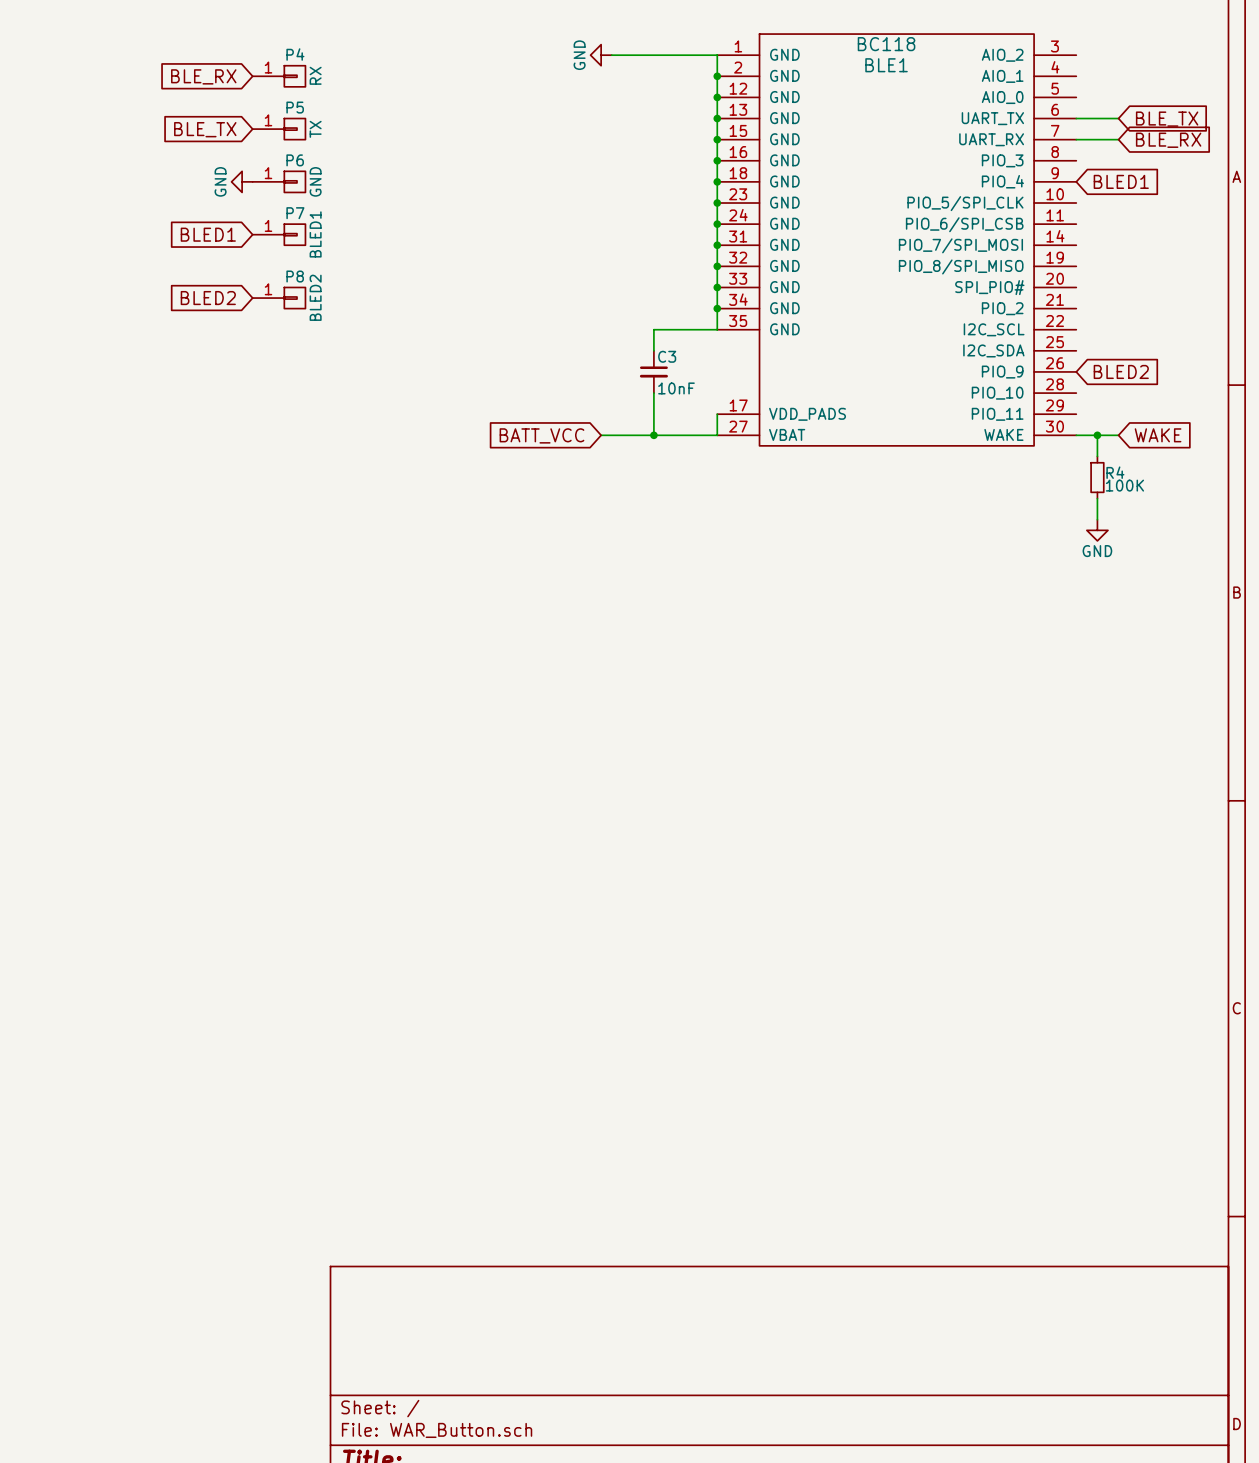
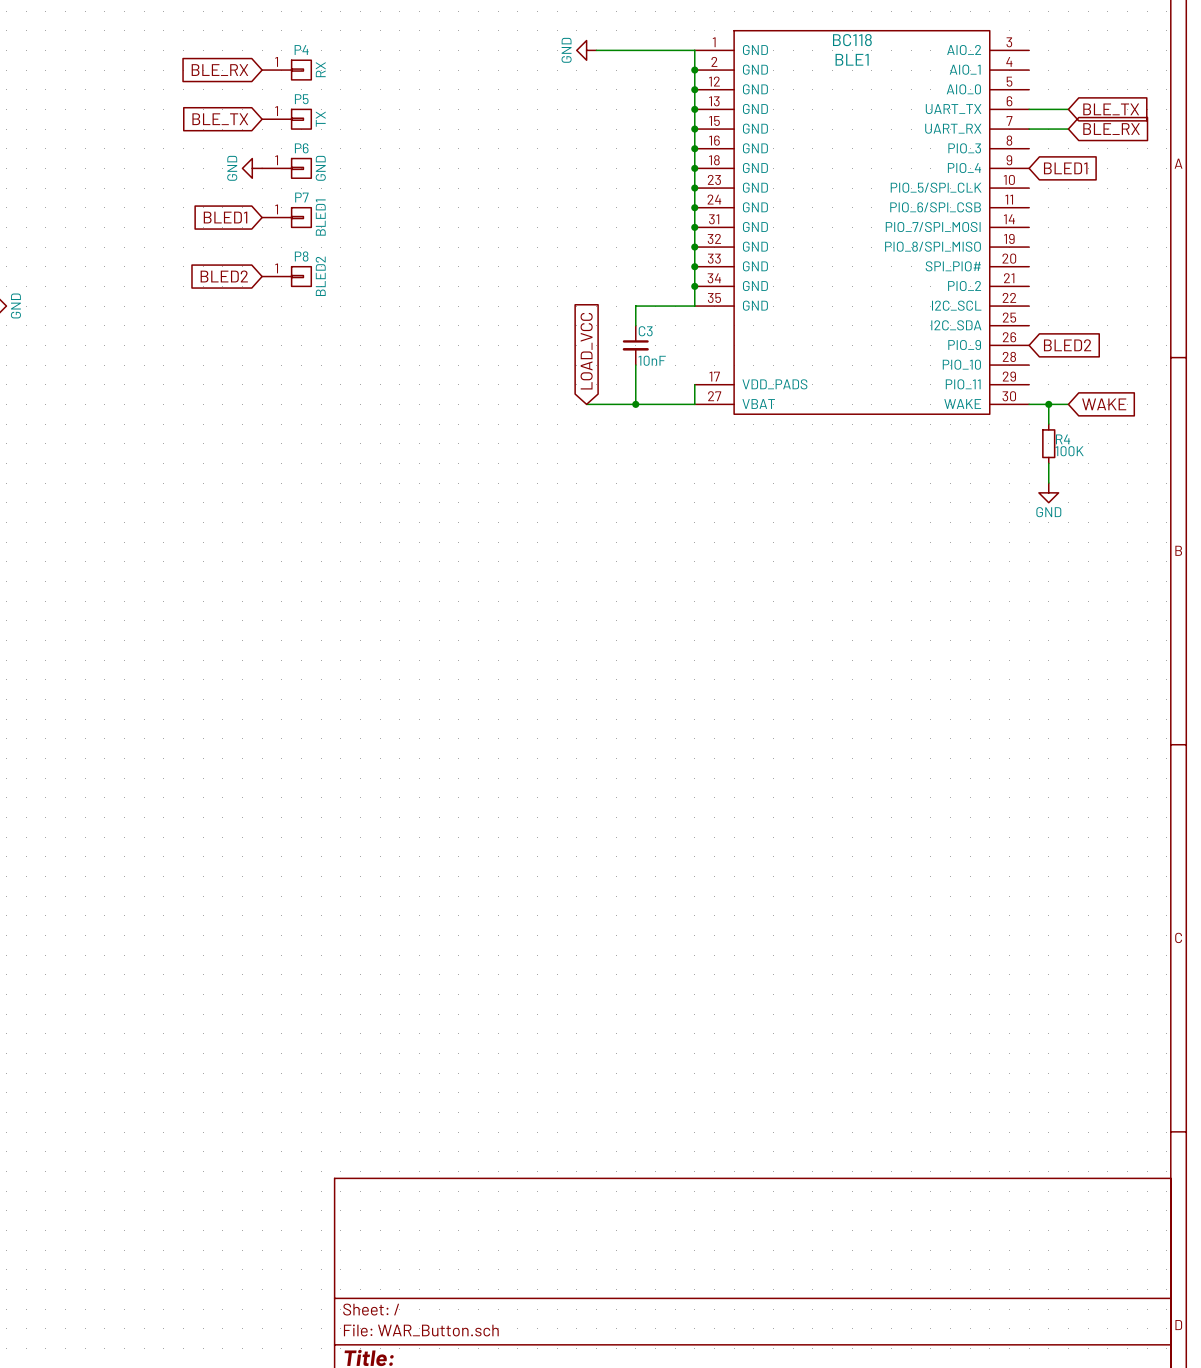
global label: BATT_VCC (541, 435) -> LOAD_VCC (586, 351)

